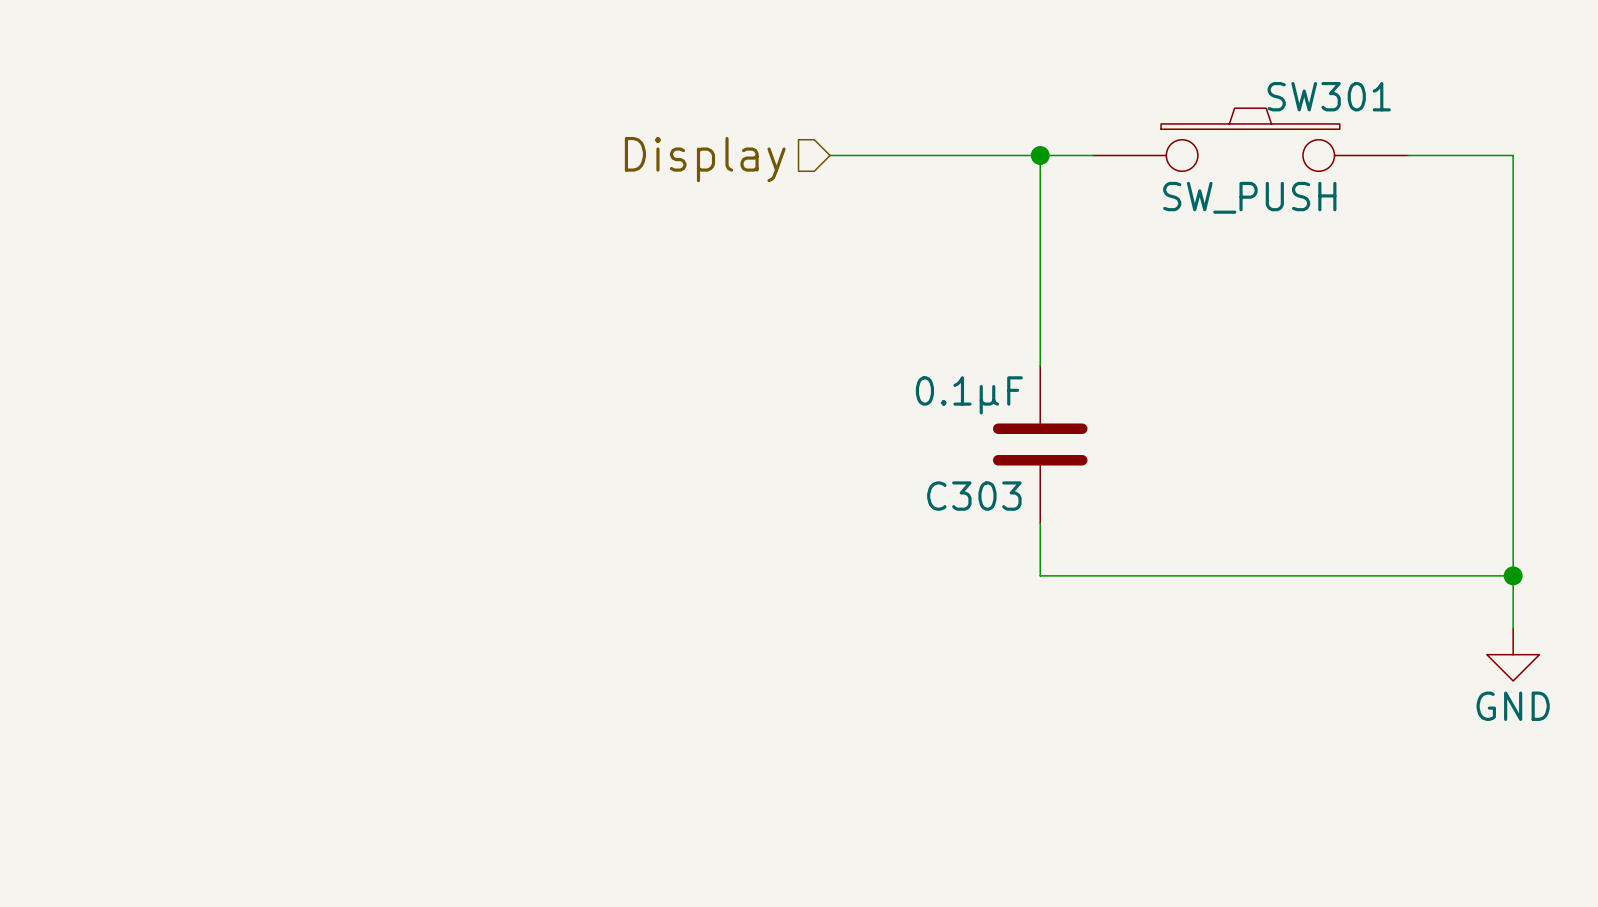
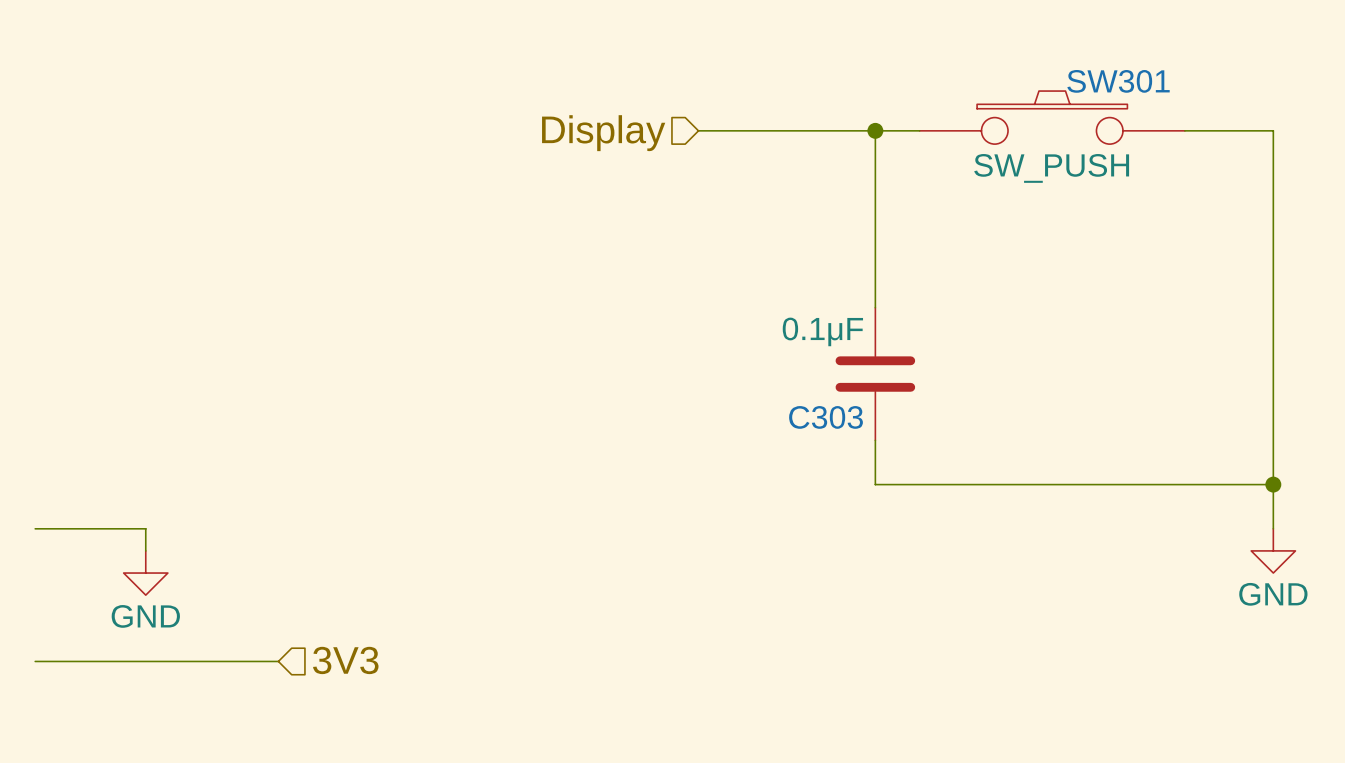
wire: none -> (35, 528) (145, 528) (145, 550)
power symbol: none -> GND (145, 573)
hierarchical label: none -> 3V3 (345, 660)
wire: none -> (35, 661) (278, 661)

